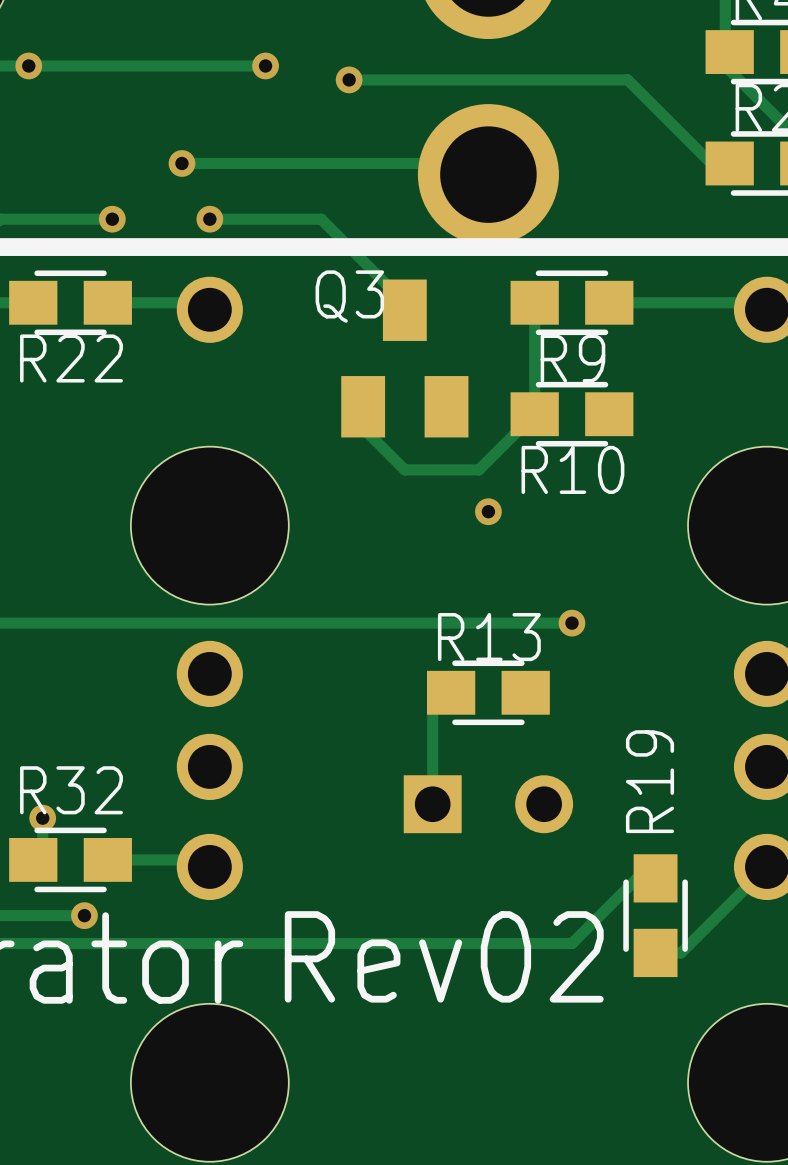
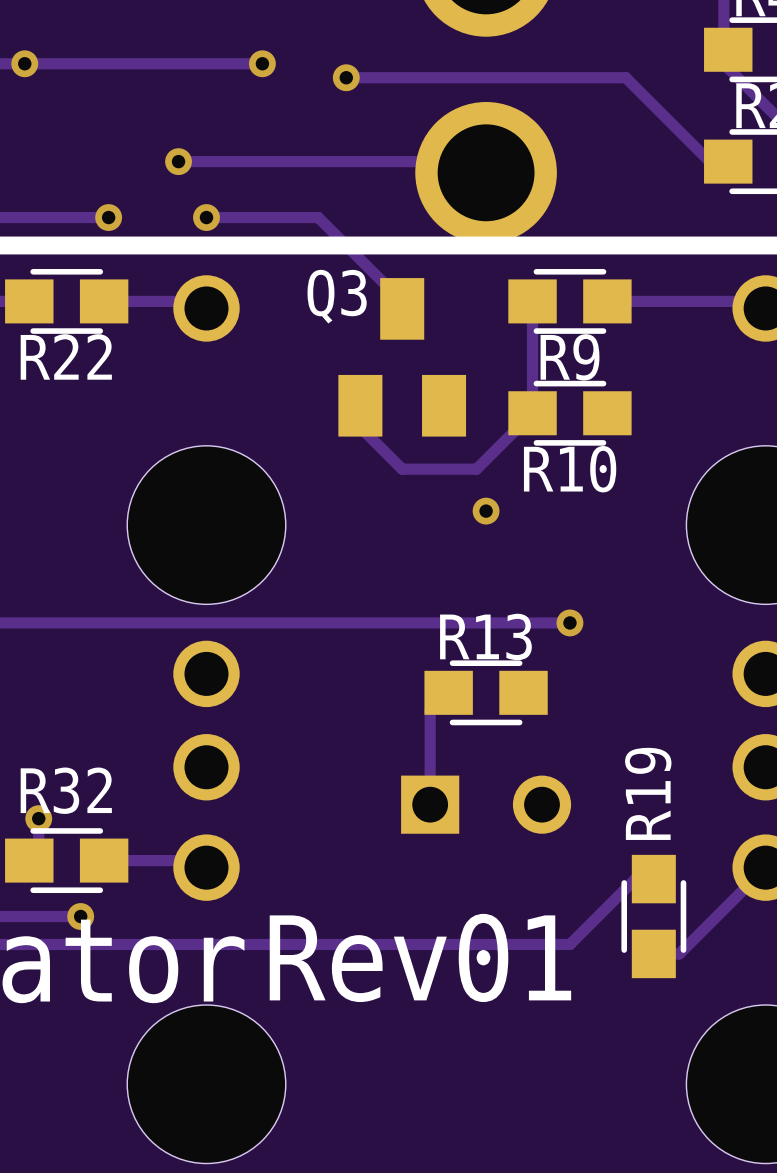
text: Rev02 (444, 956) -> Rev01 (420, 957)

